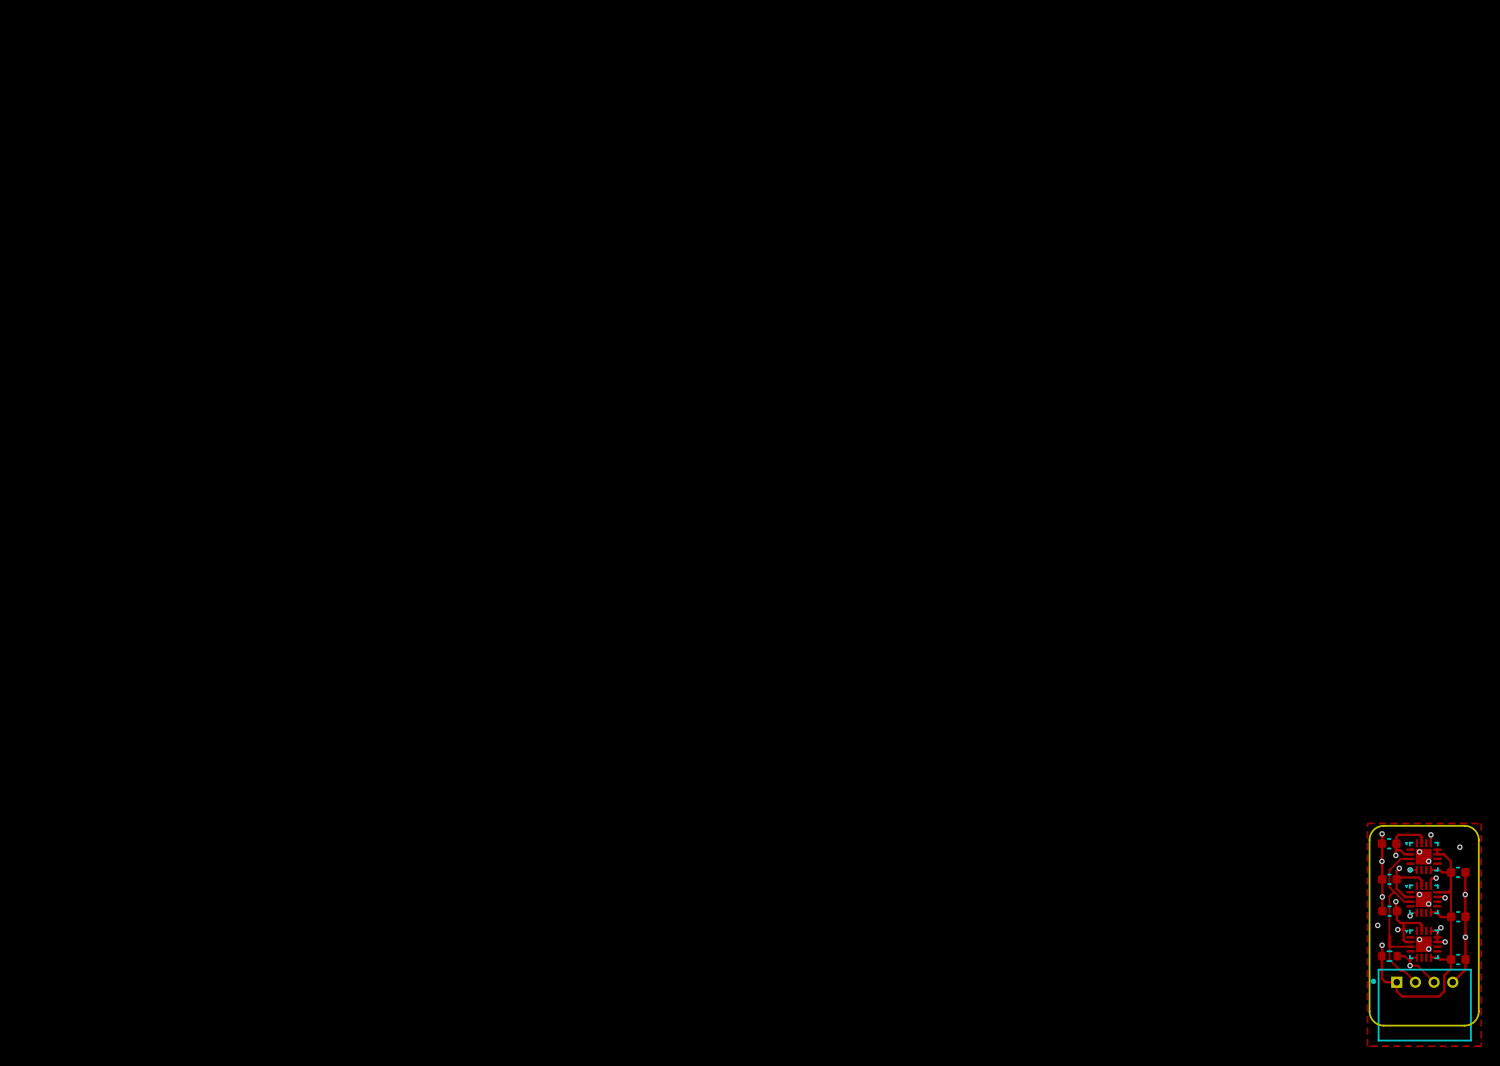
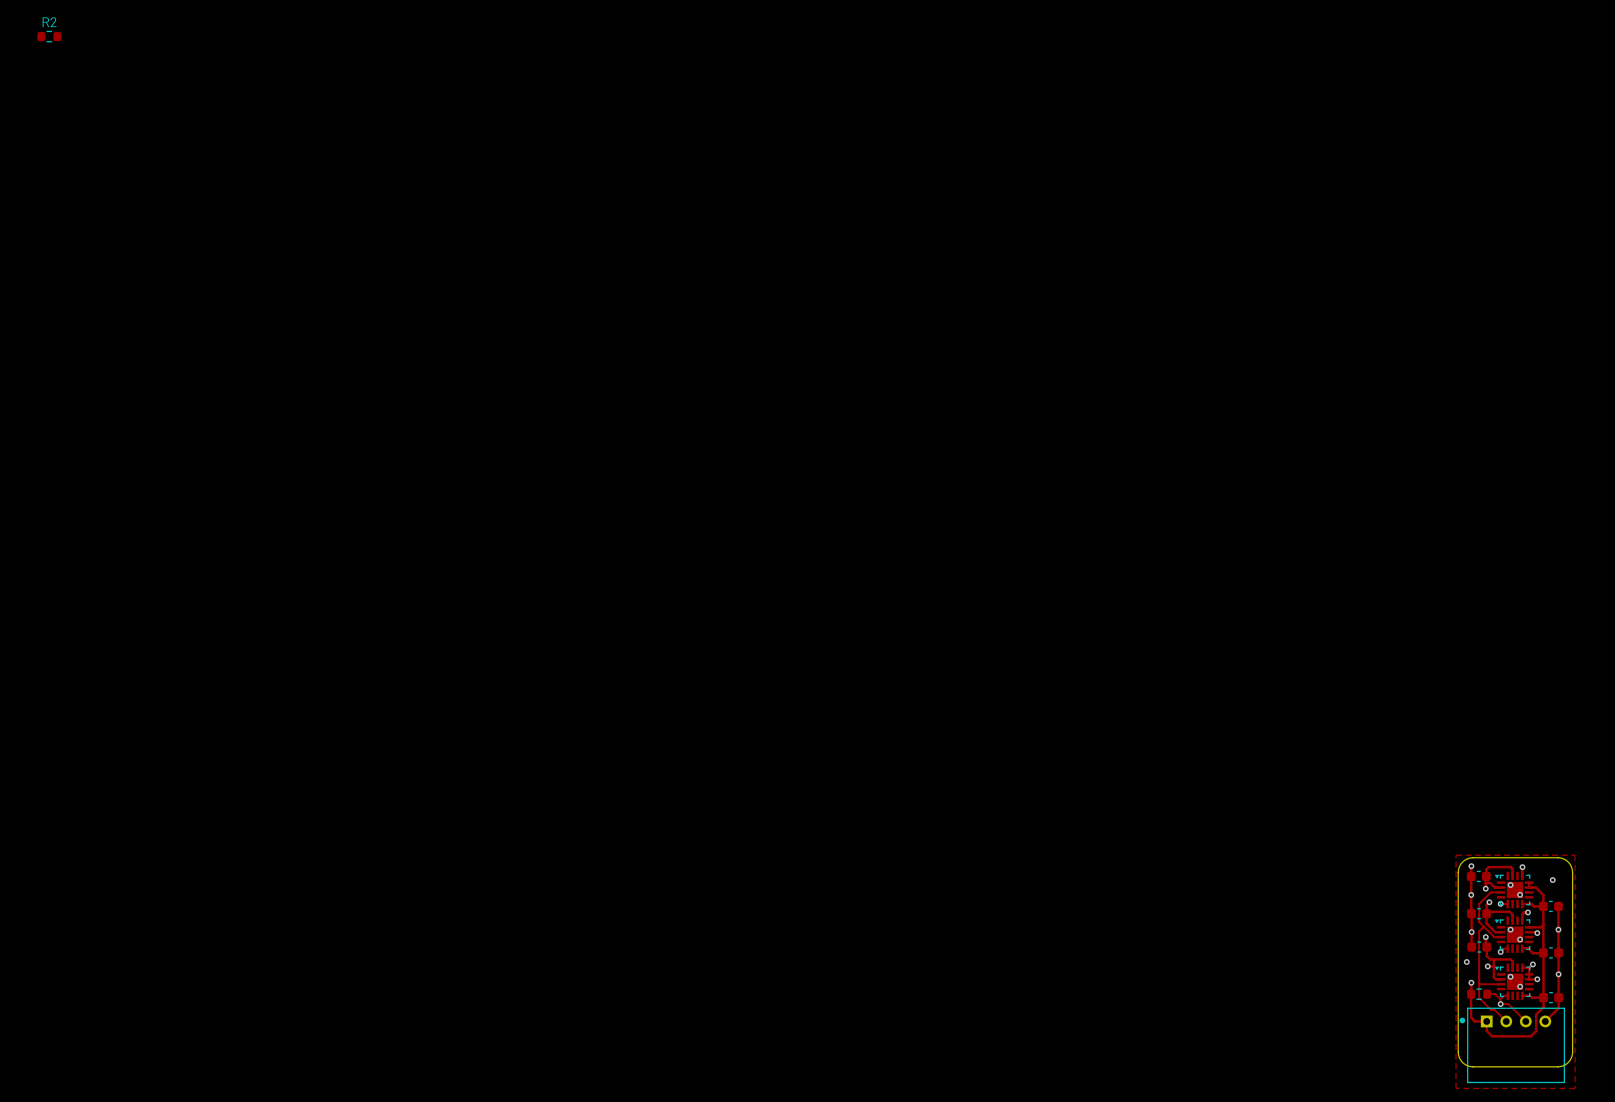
R2: none -> (49, 36)

